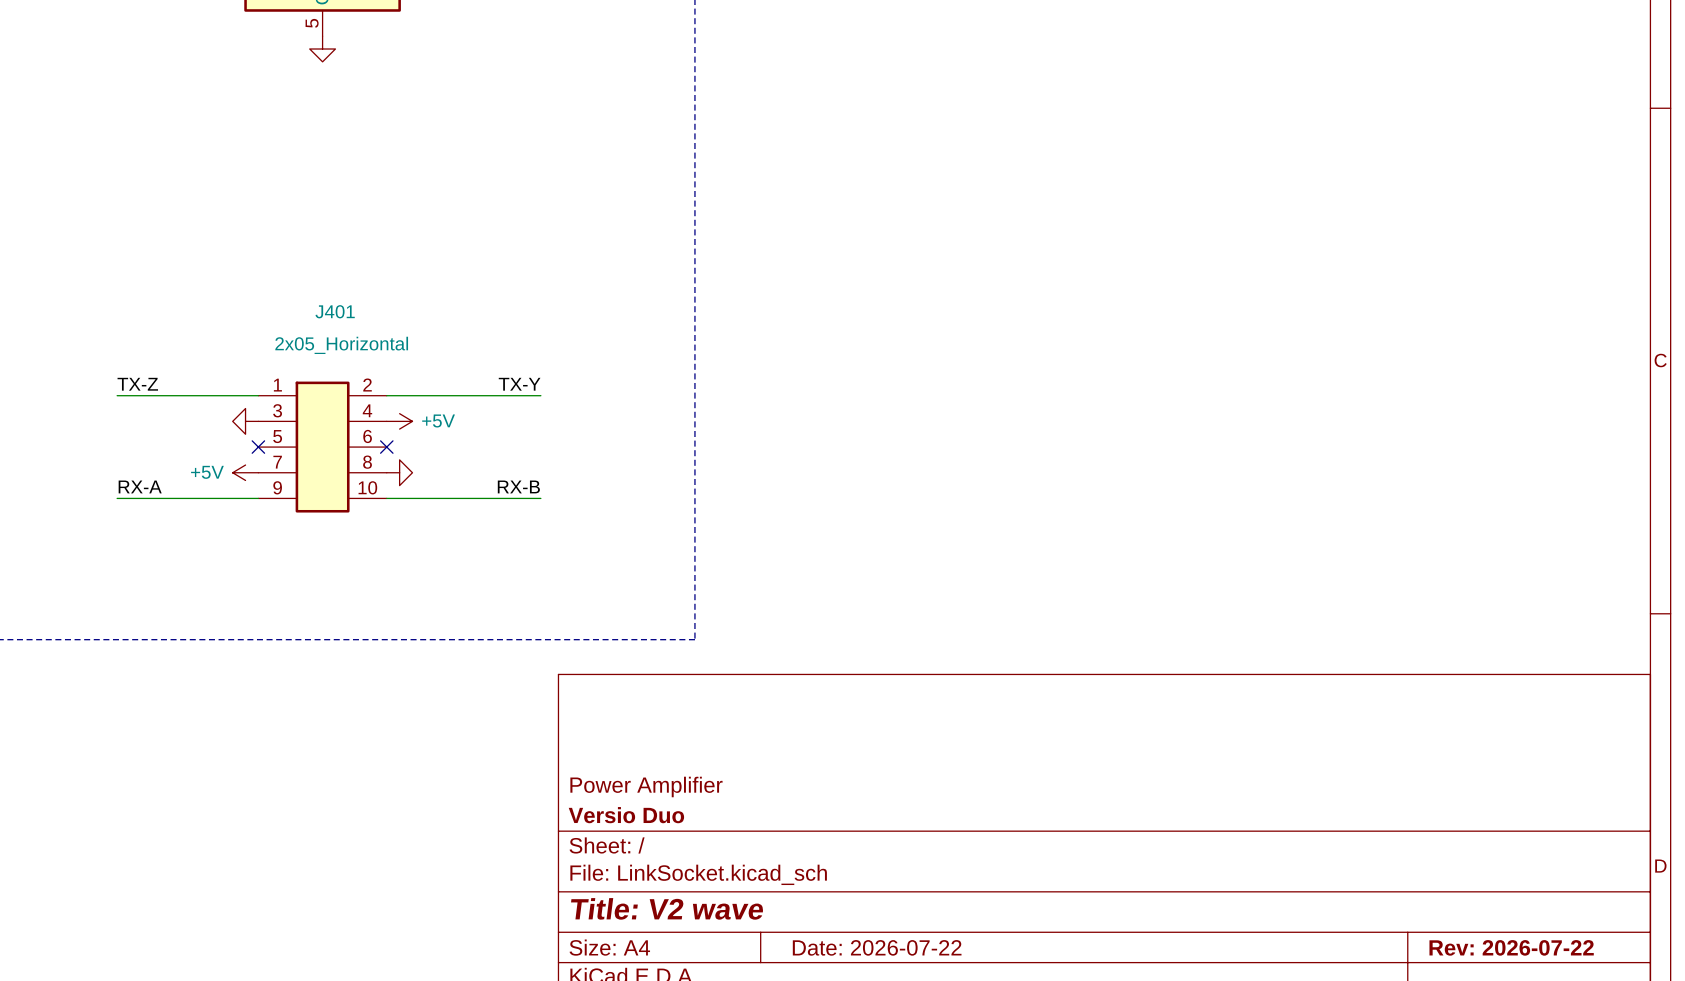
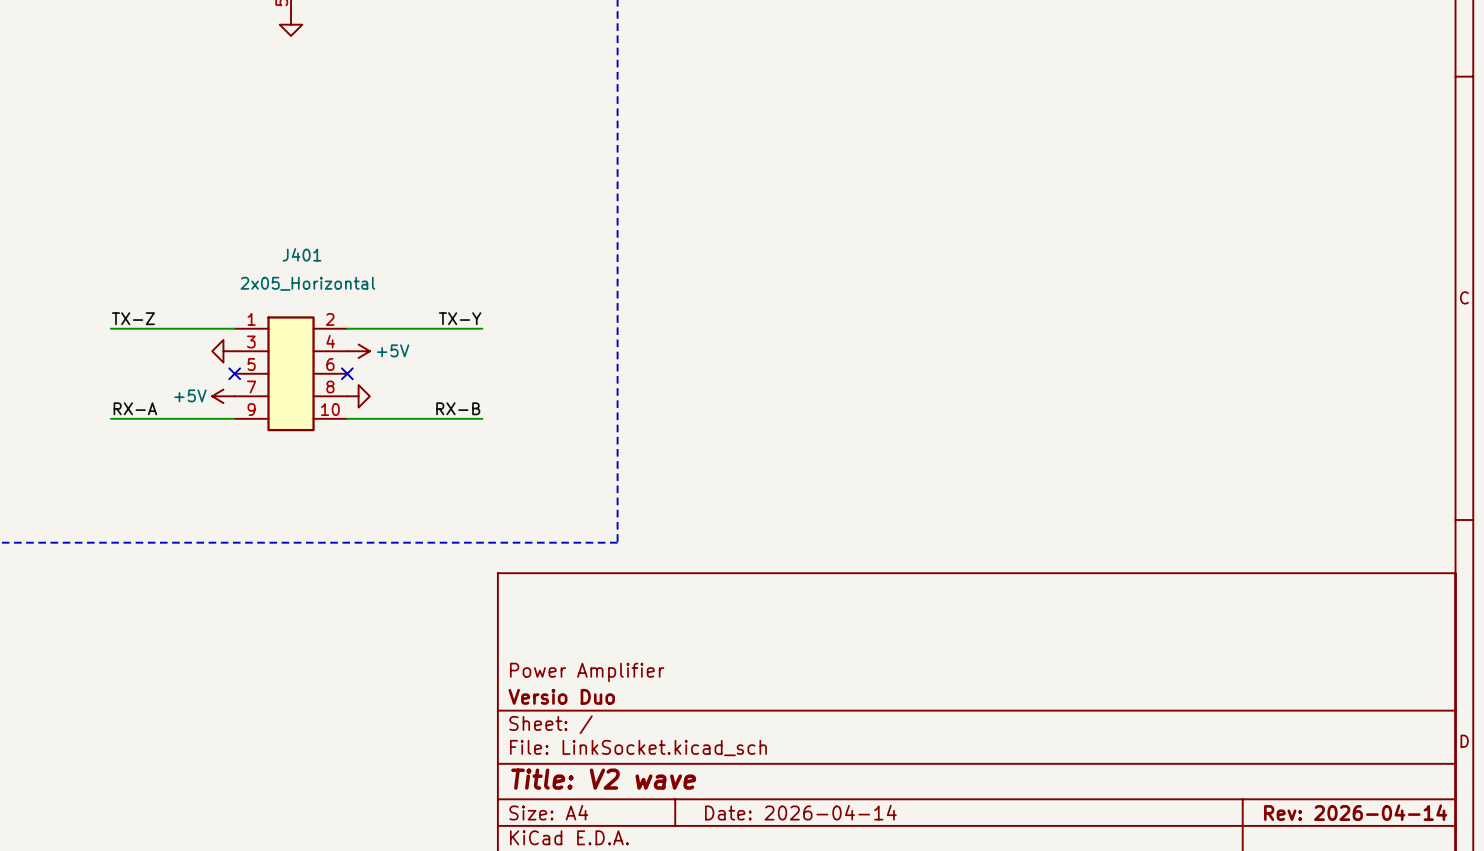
title block: Date: 2026-07-22 (877, 947) -> Date: 2026-04-14 (800, 812)
title block: Rev: 2026-07-22 (1511, 947) -> Rev: 2026-04-14 (1355, 812)

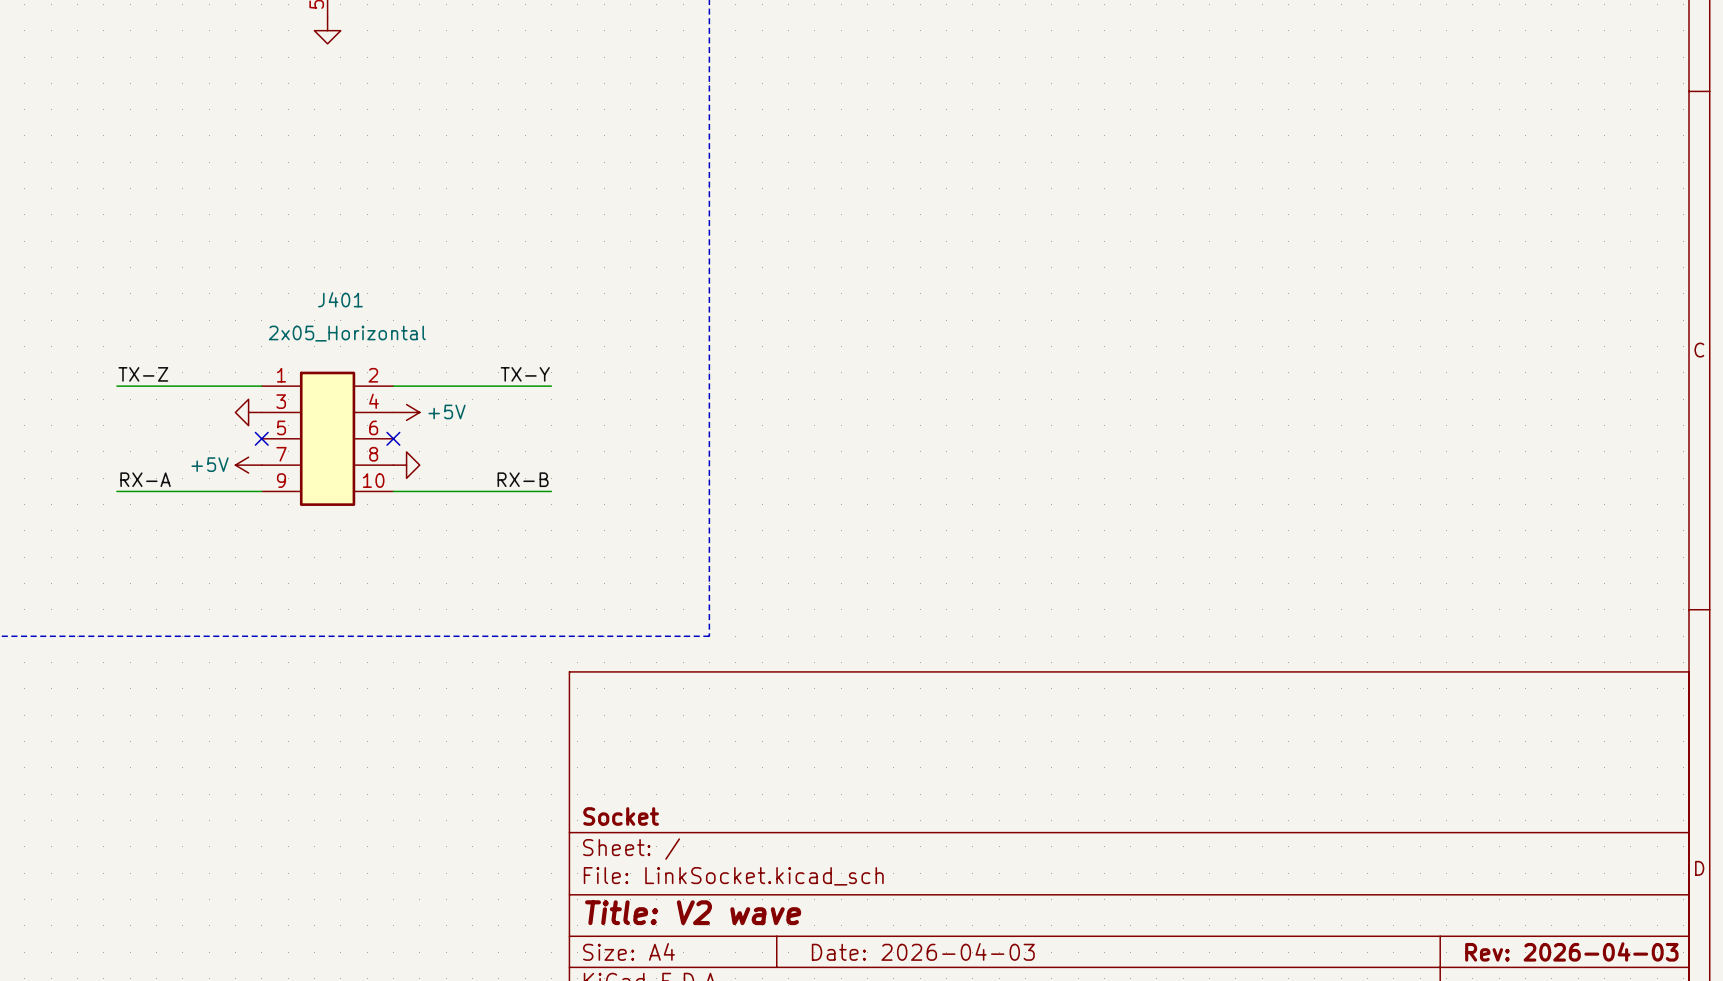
title block: Power Amplifier (587, 672) -> none
title block: Versio Duo (561, 696) -> Socket (621, 816)
title block: Date: 2026-04-14 (800, 812) -> Date: 2026-04-03 (923, 951)
title block: Rev: 2026-04-14 (1355, 812) -> Rev: 2026-04-03 (1571, 951)

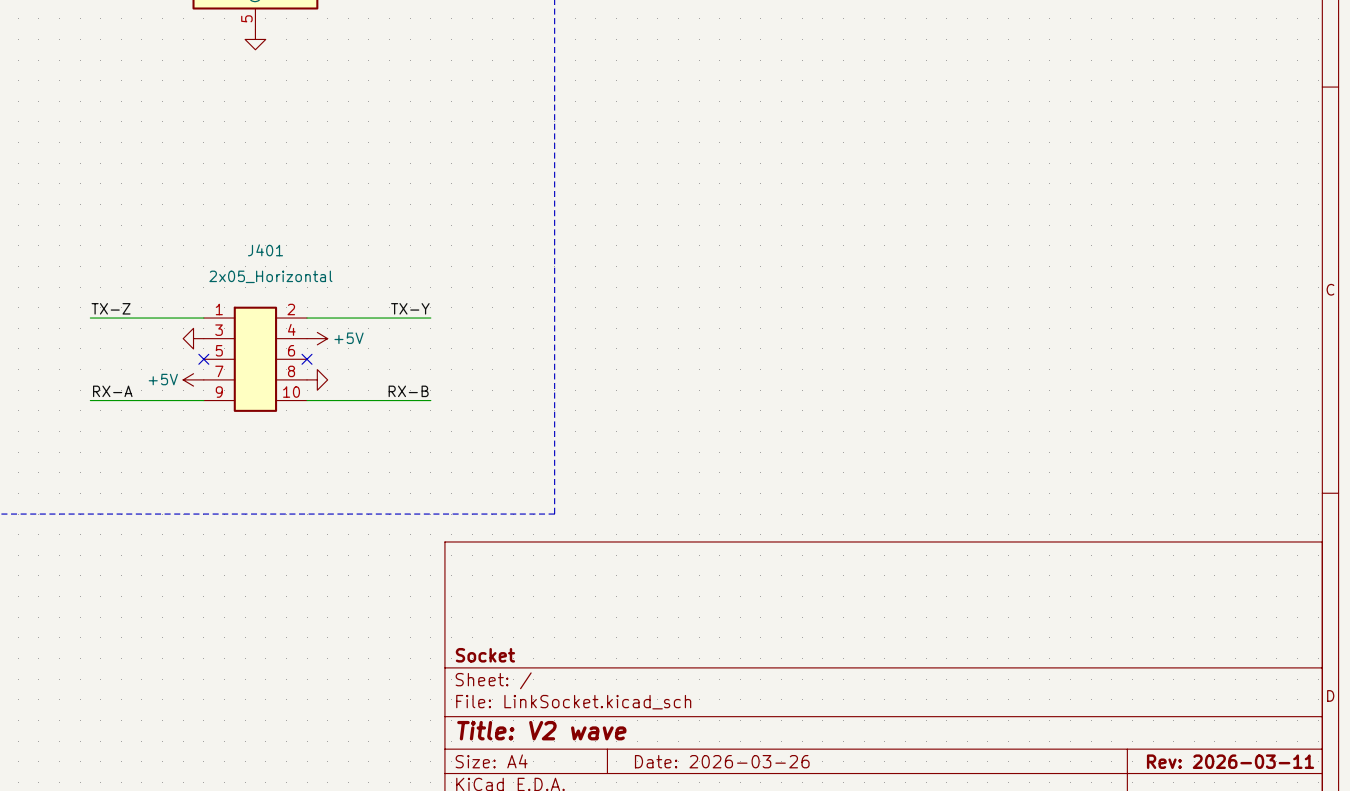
title block: Date: 2026-04-03 (923, 951) -> Date: 2026-03-26 (722, 761)
title block: Rev: 2026-04-03 (1571, 951) -> Rev: 2026-03-11 (1230, 761)

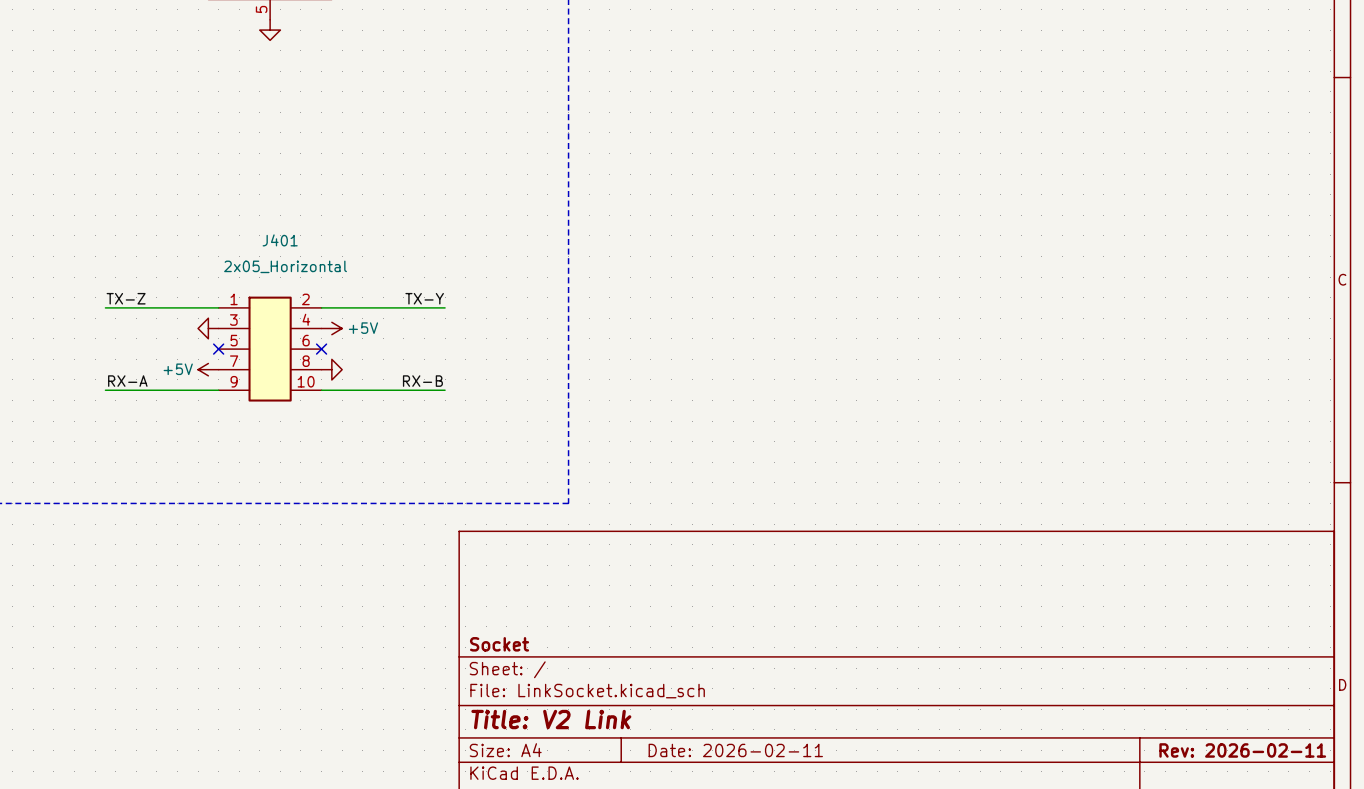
title block: Title: V2 wave (541, 730) -> Title: V2 Link (551, 719)
title block: Date: 2026-03-26 (722, 761) -> Date: 2026-02-11 (735, 750)
title block: Rev: 2026-03-11 (1230, 761) -> Rev: 2026-02-11 (1242, 750)

